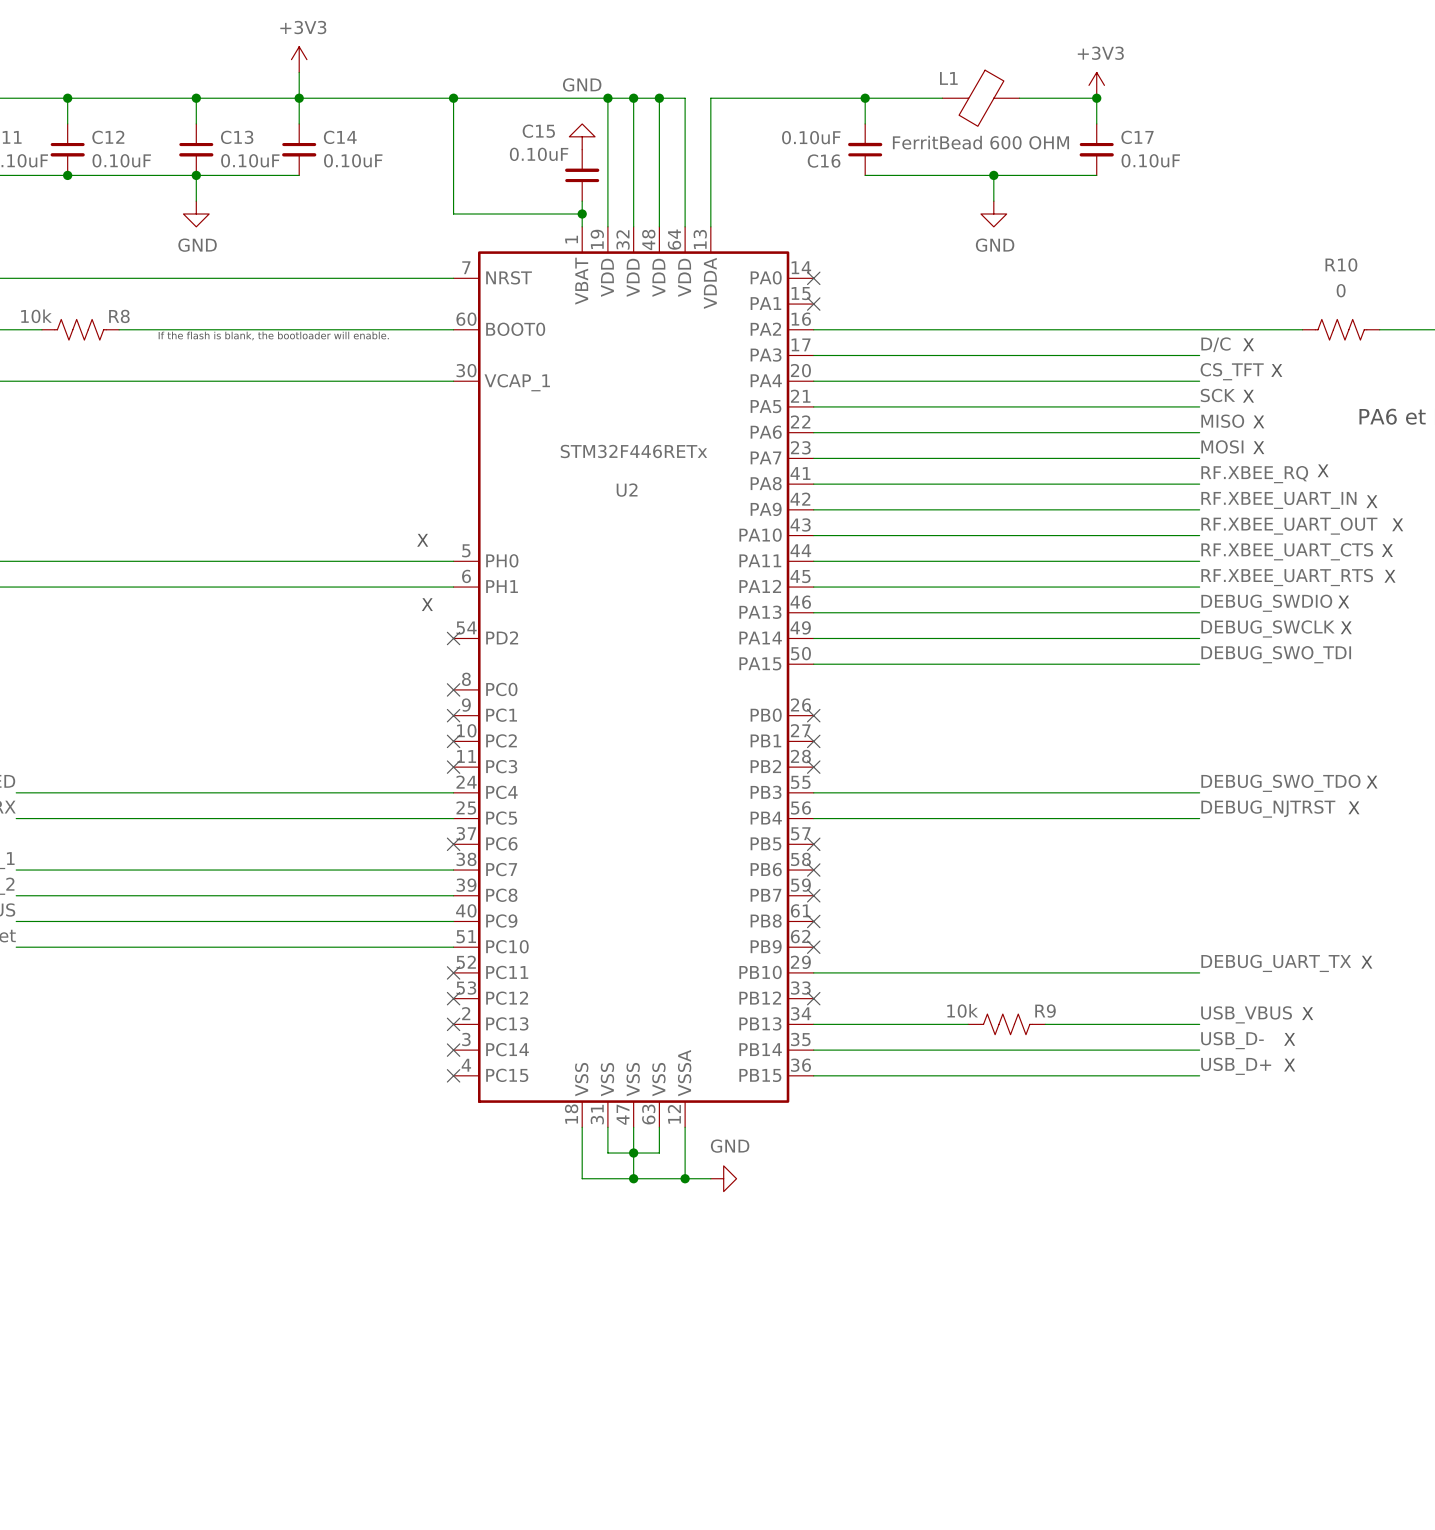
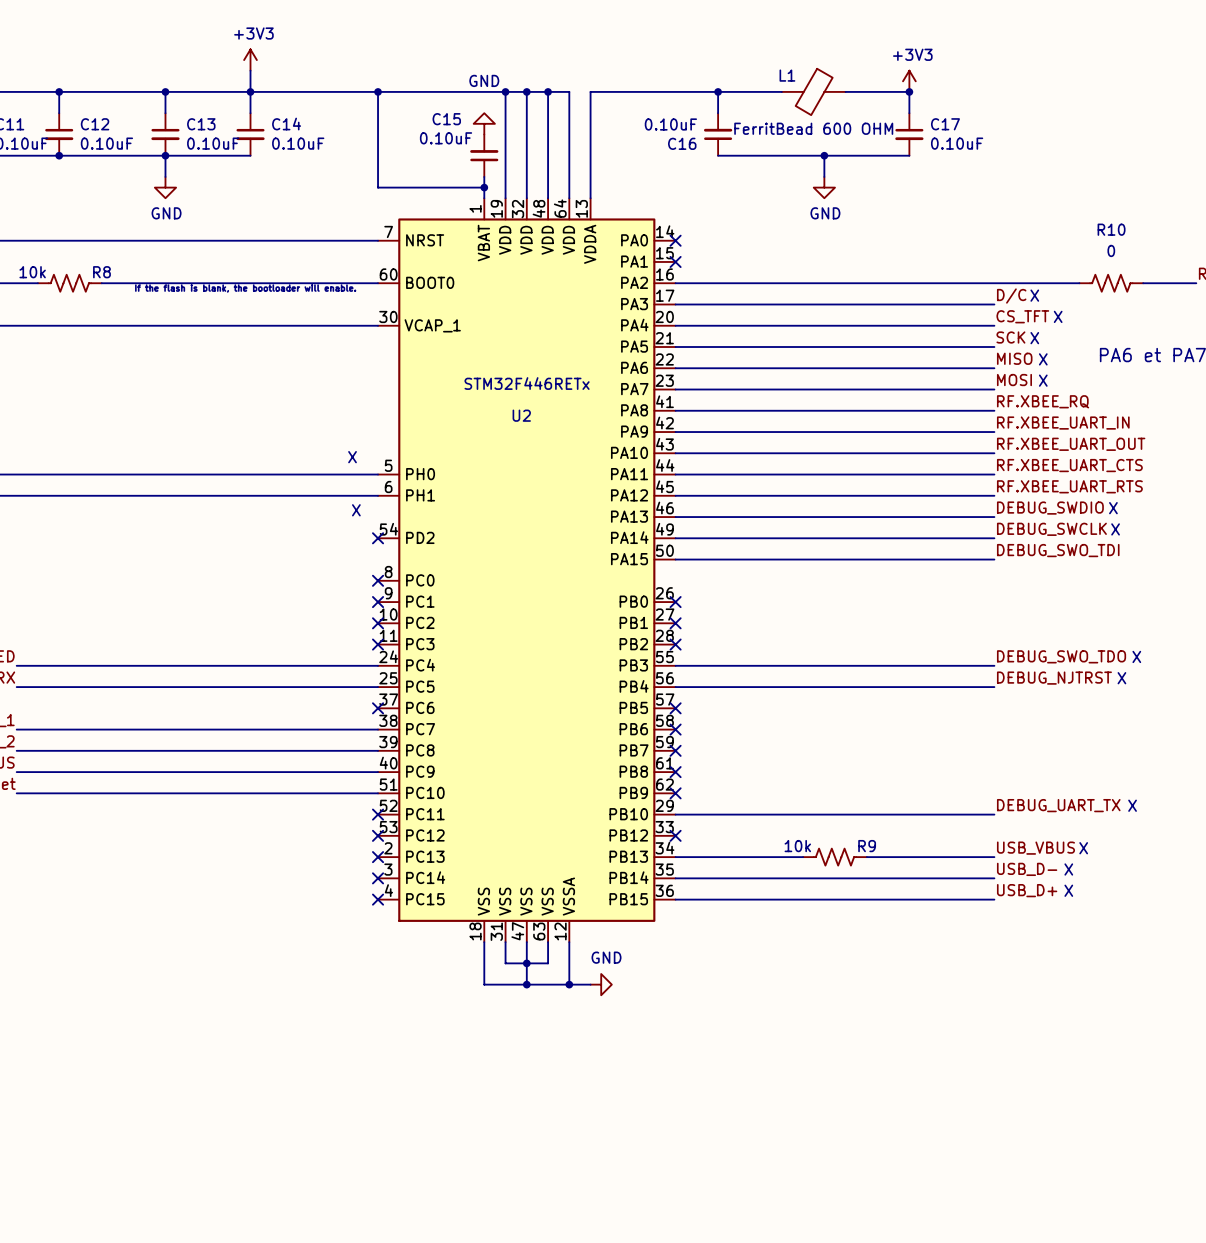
text: X (1323, 470) -> none
text: X (1371, 501) -> none
text: X (1397, 524) -> none
text: X (1387, 550) -> none
text: X (1389, 576) -> none

